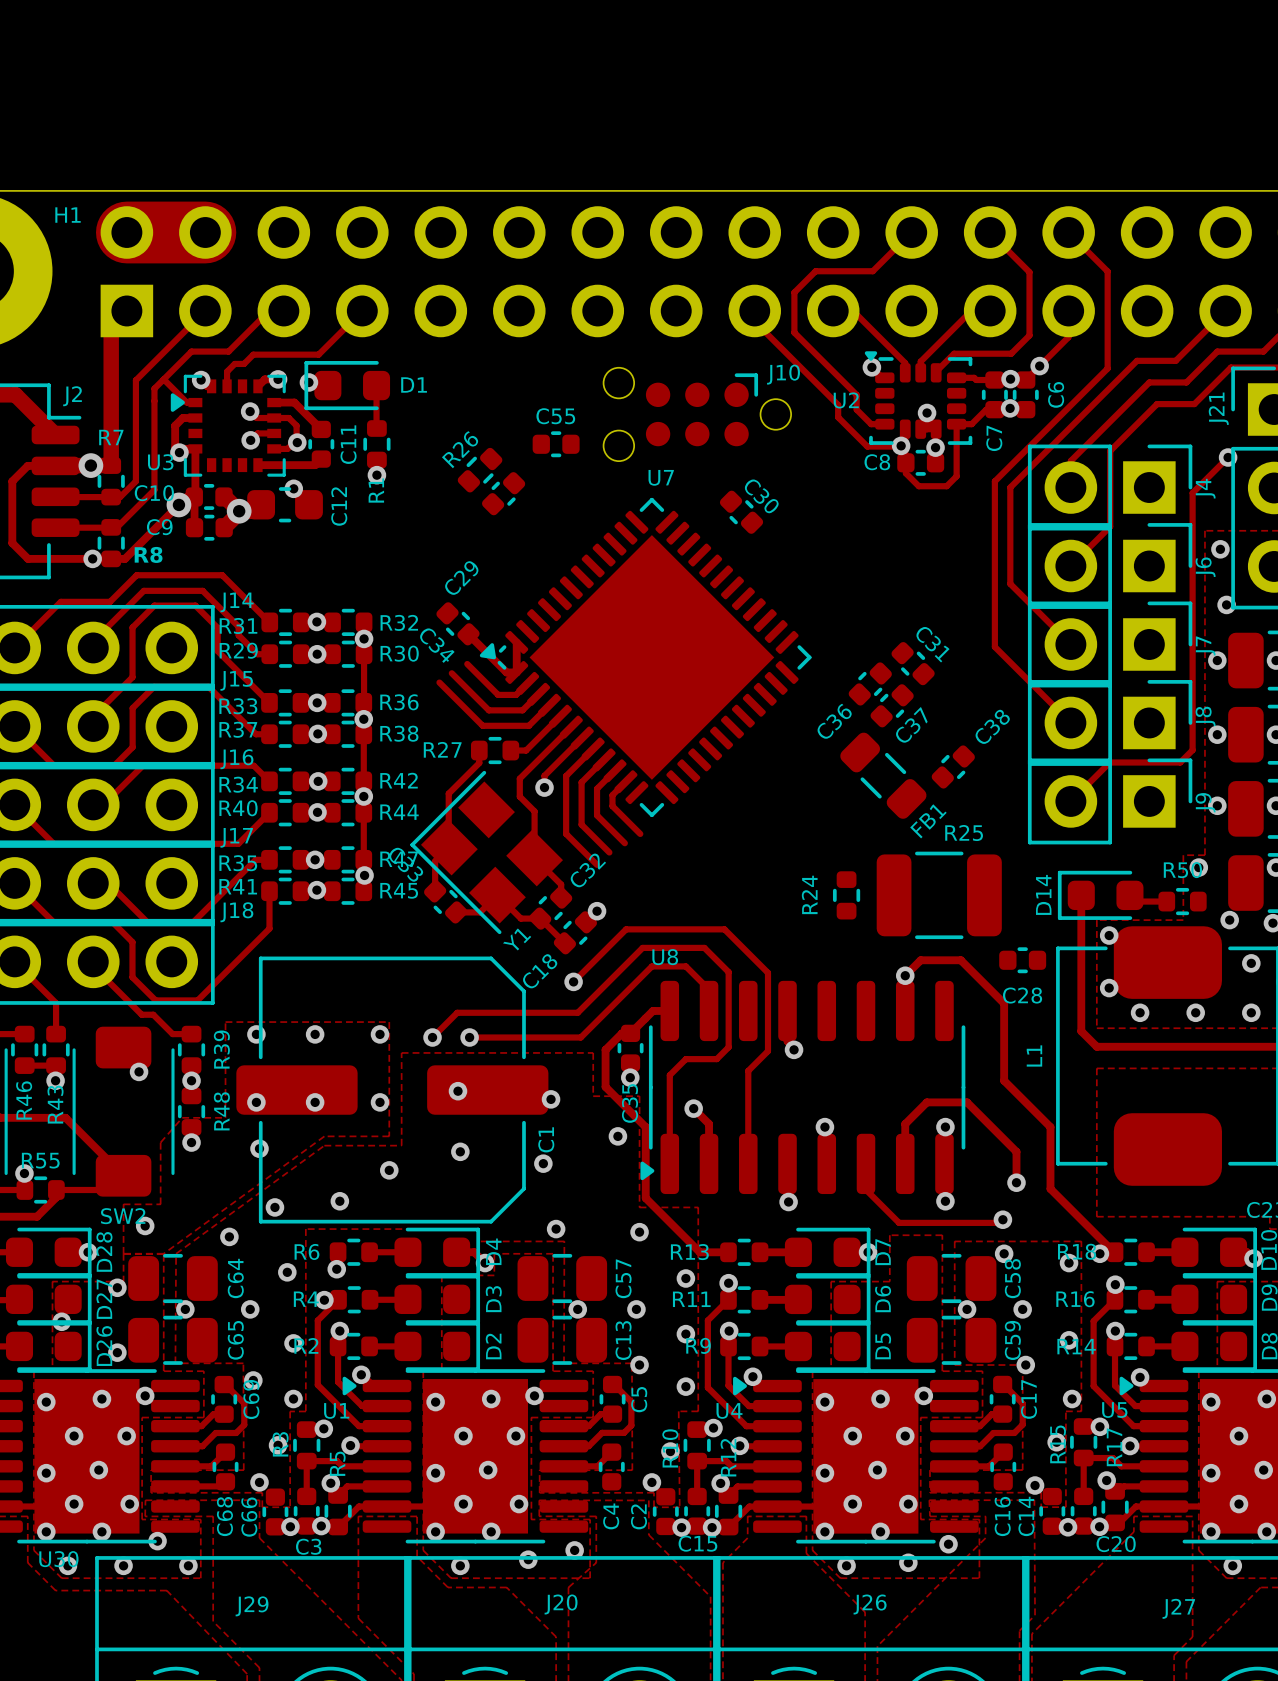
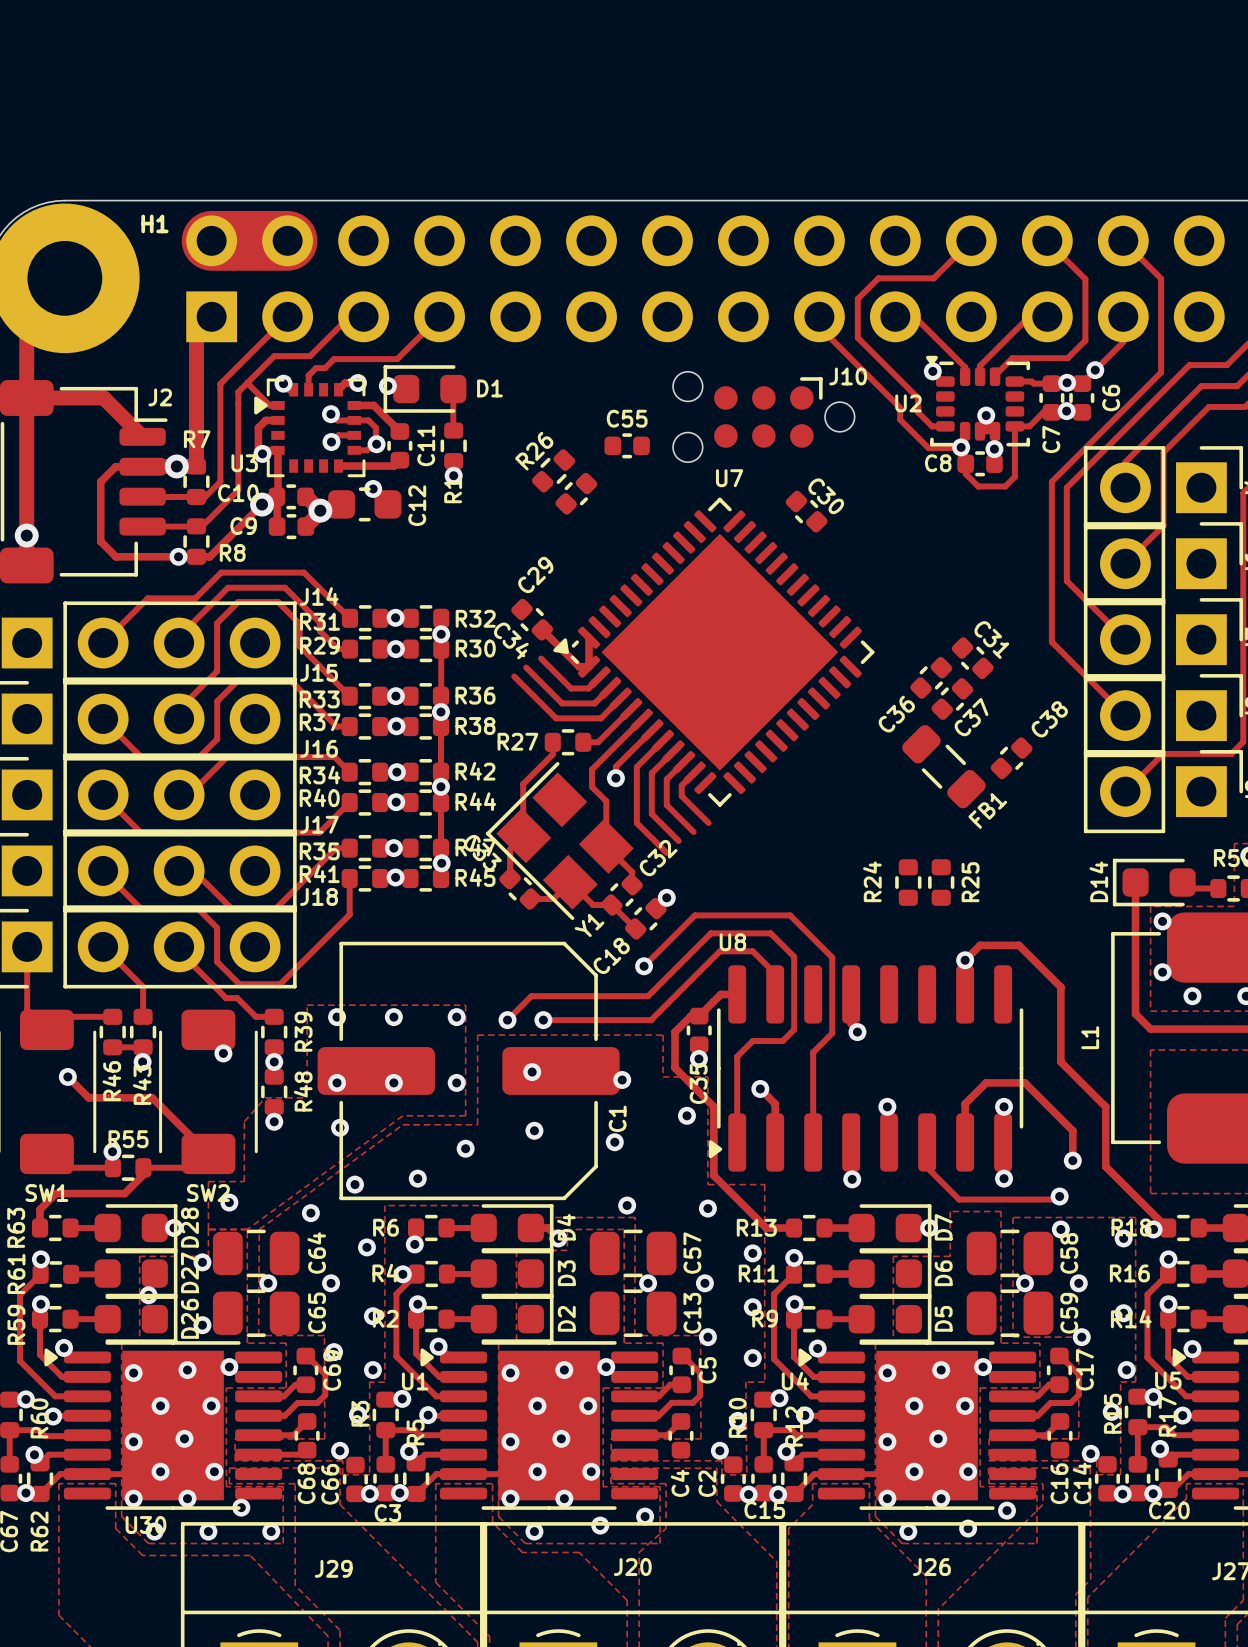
R25 name position: R25 (964, 833) -> R25 (970, 882)
R25 footprint: [876, 851, 1002, 940] -> [928, 859, 955, 906]
C28: (1022, 960) -> none

